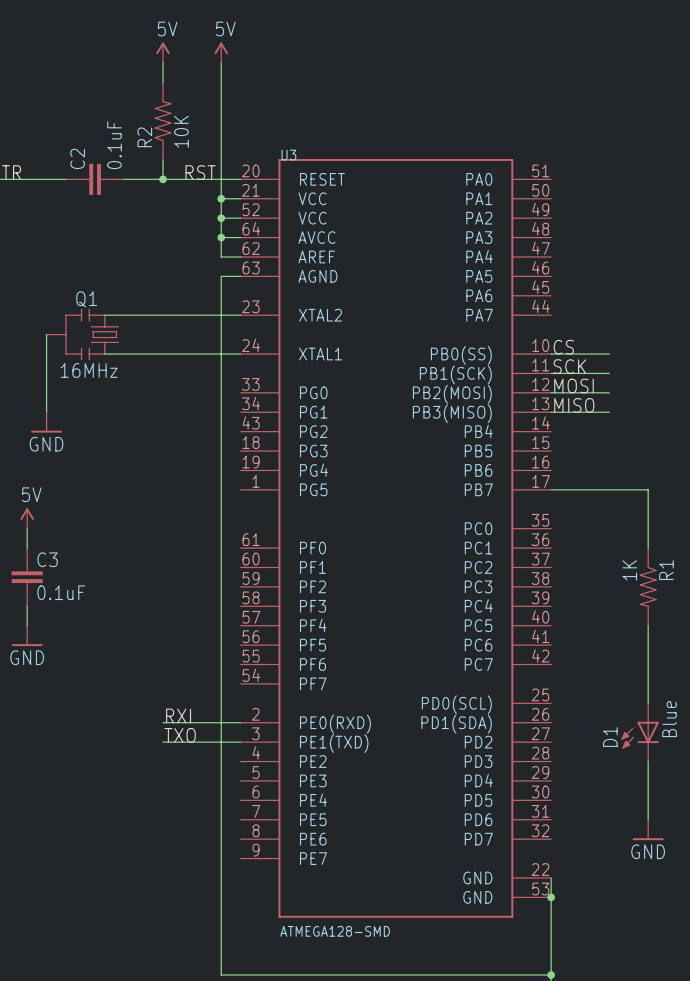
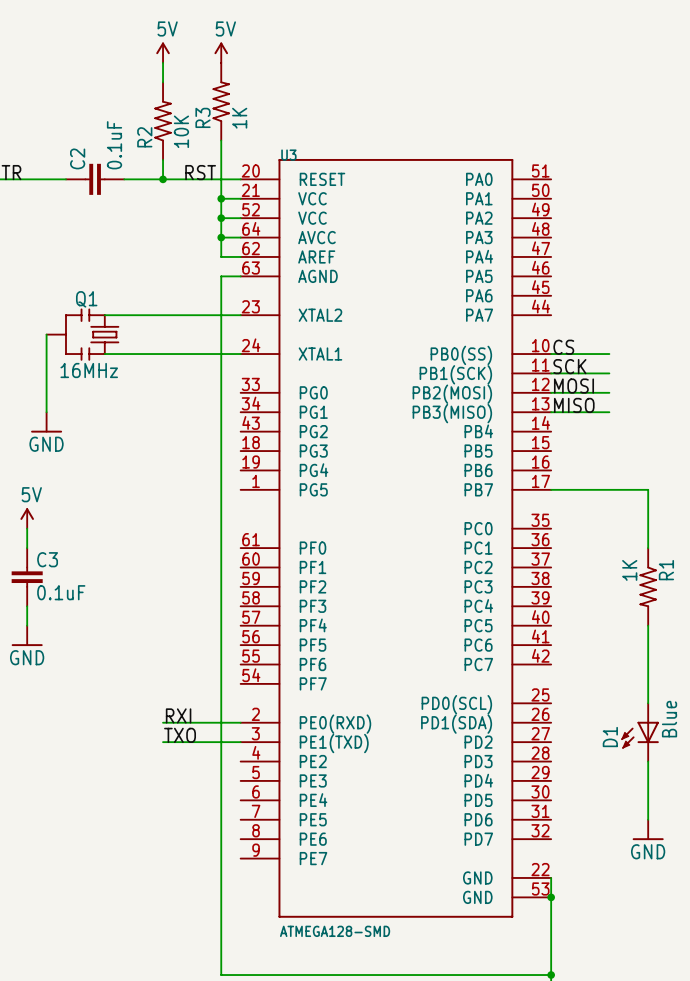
R3: none -> 1K (221, 101)

